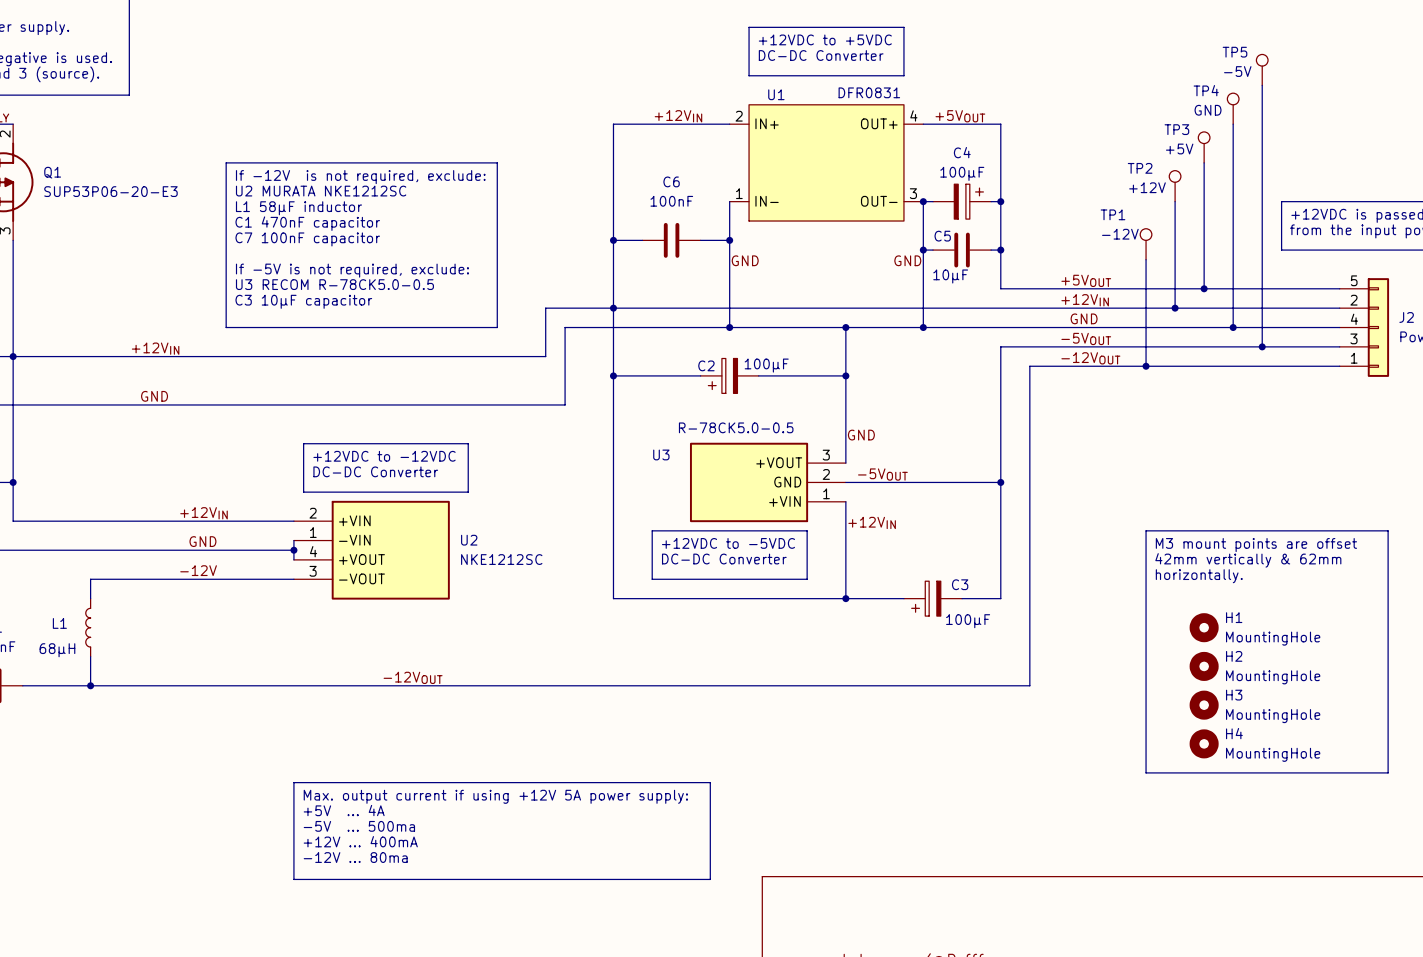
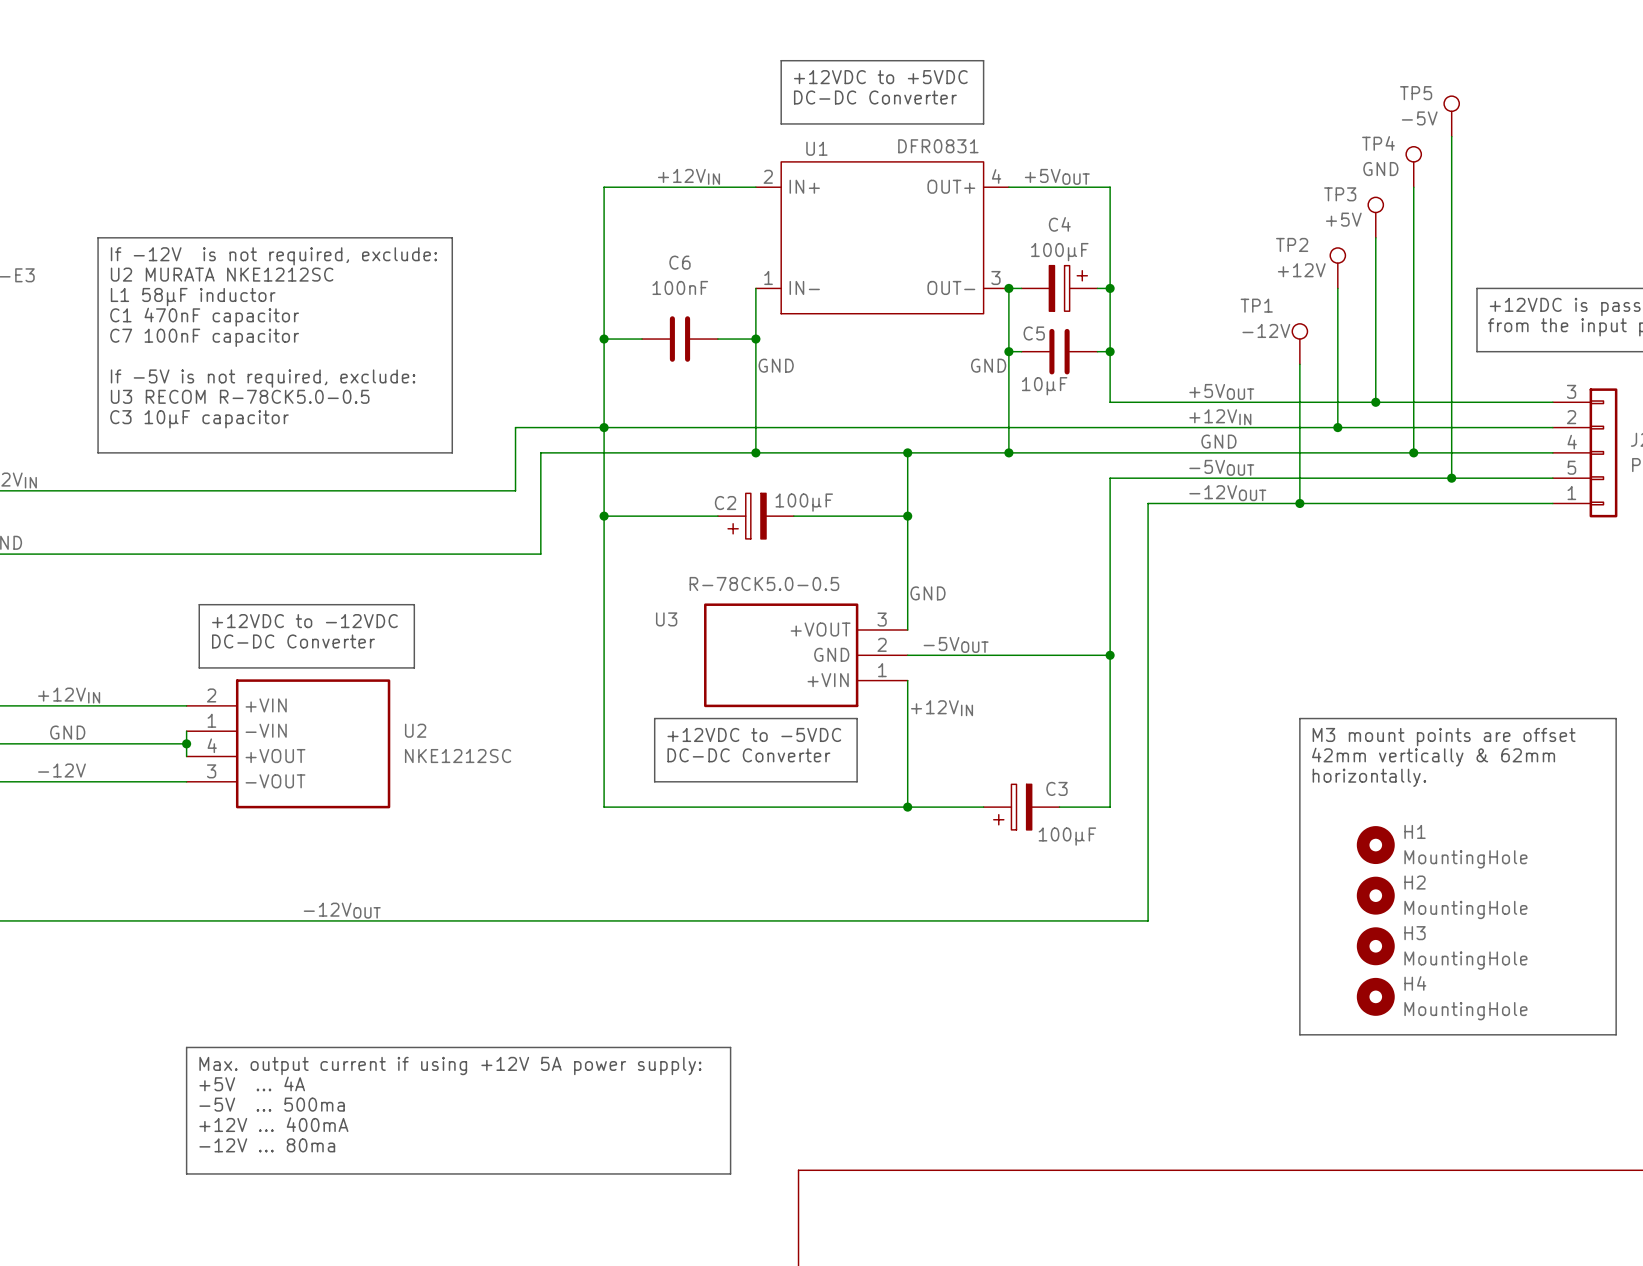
J2 pin number: 5 (1354, 280) -> 3 (1571, 391)
J2 pin number: 3 (1353, 338) -> 5 (1571, 467)

